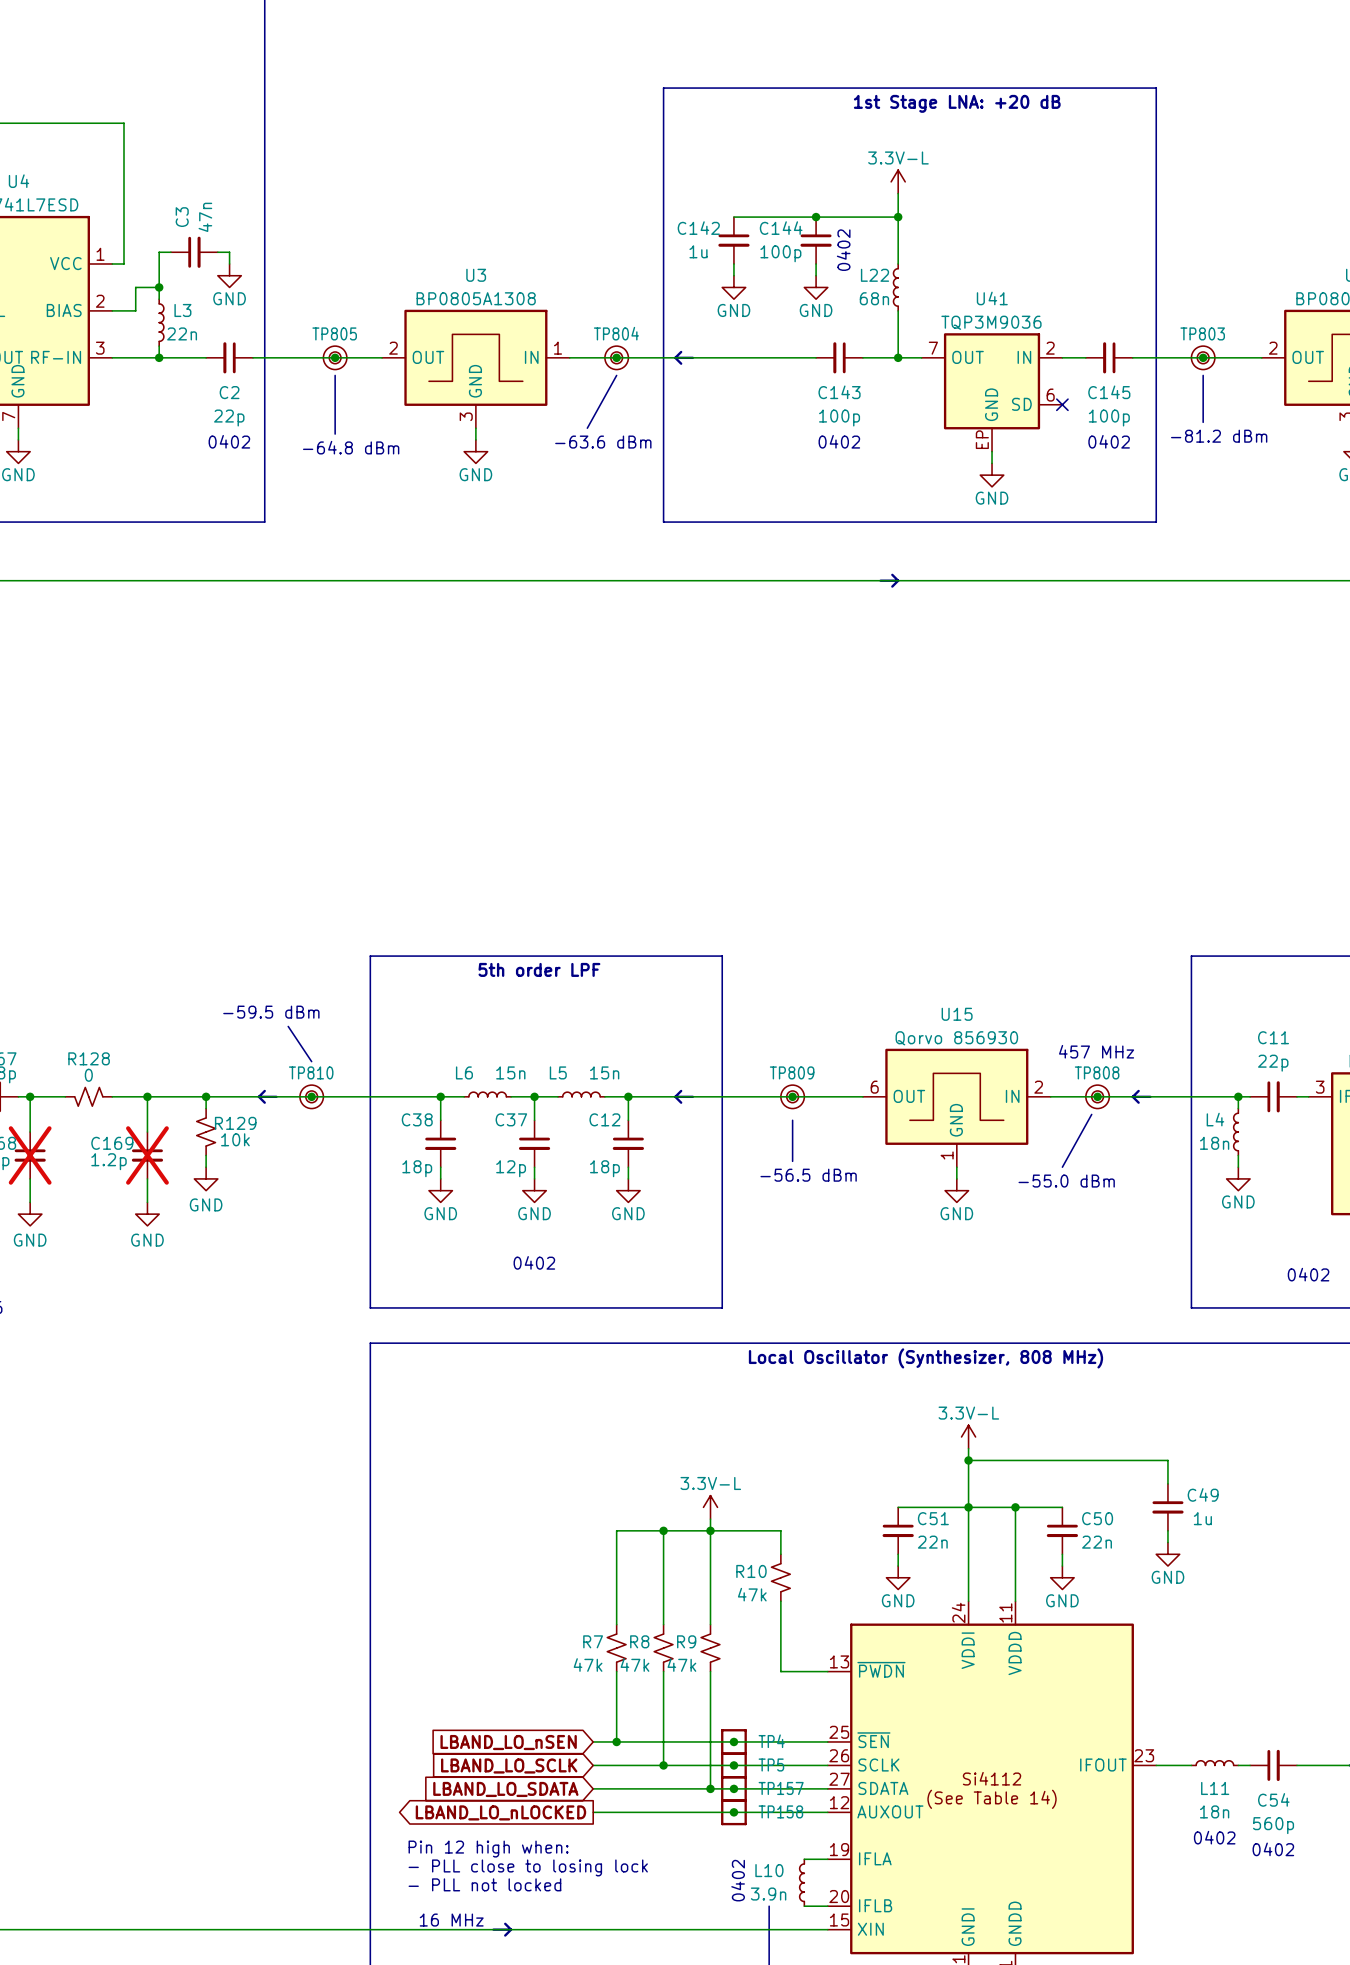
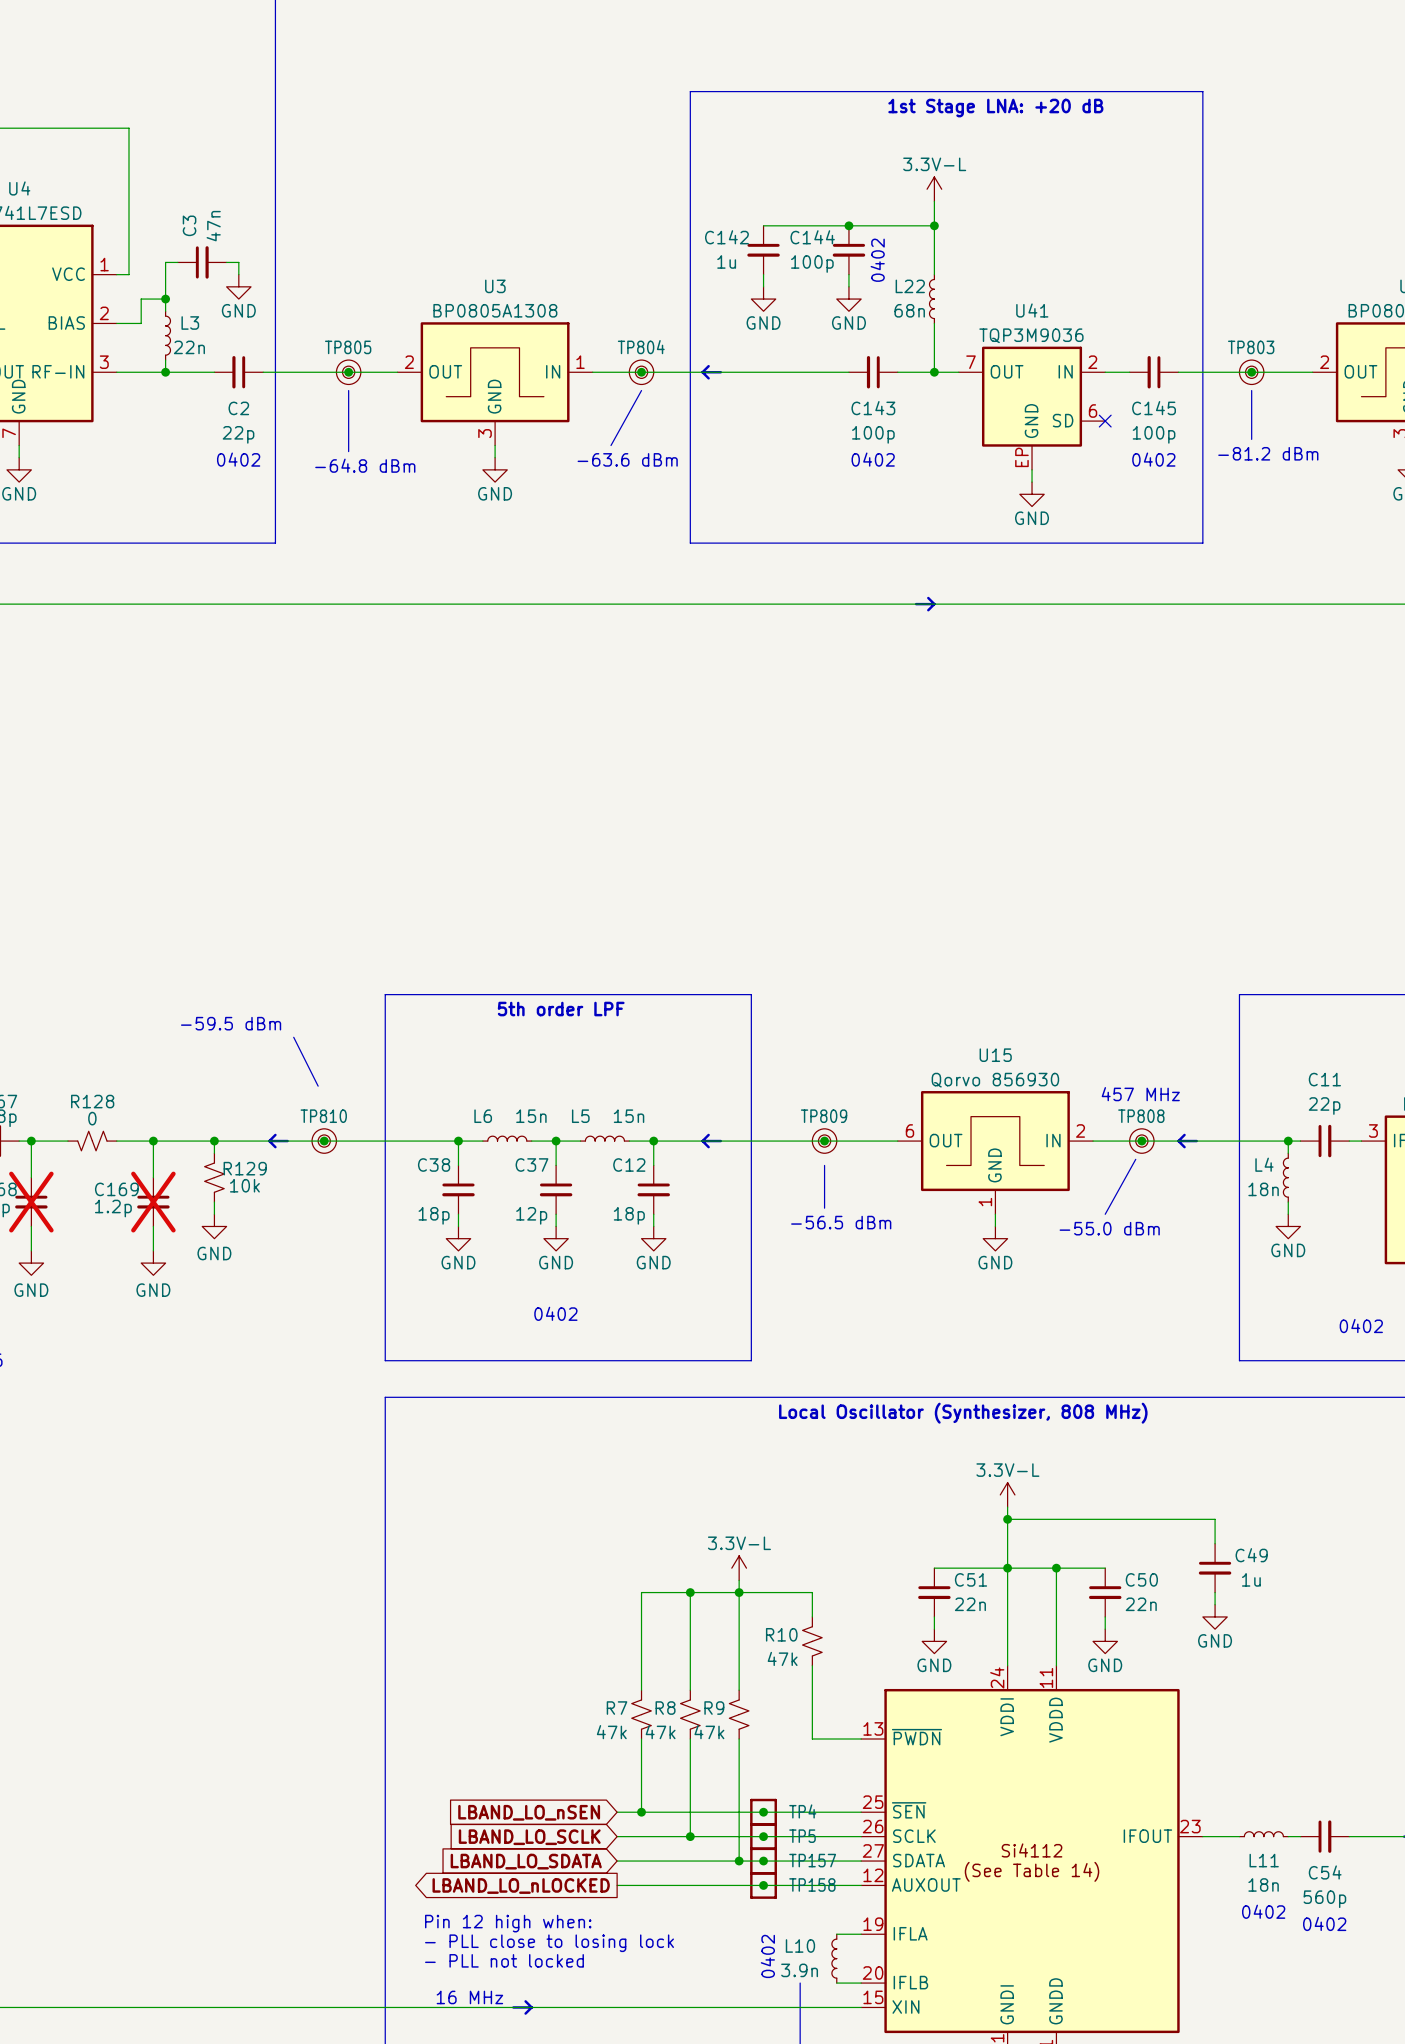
line: none -> (293, 1037) (318, 1086)
text position: -59.5 dBm (271, 1012) -> -59.5 dBm (231, 1023)
line: (288, 1026) (311, 1061) -> none

